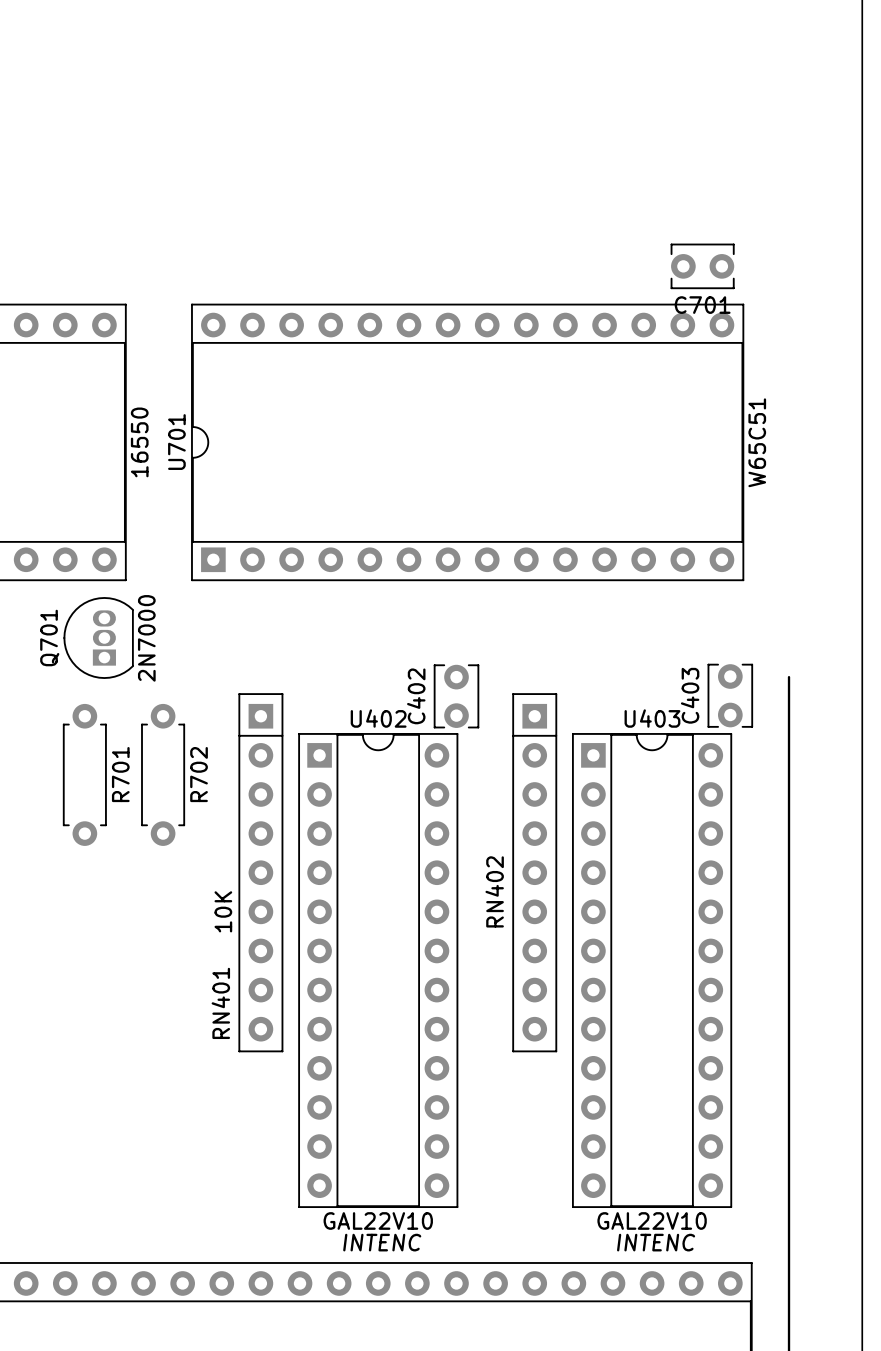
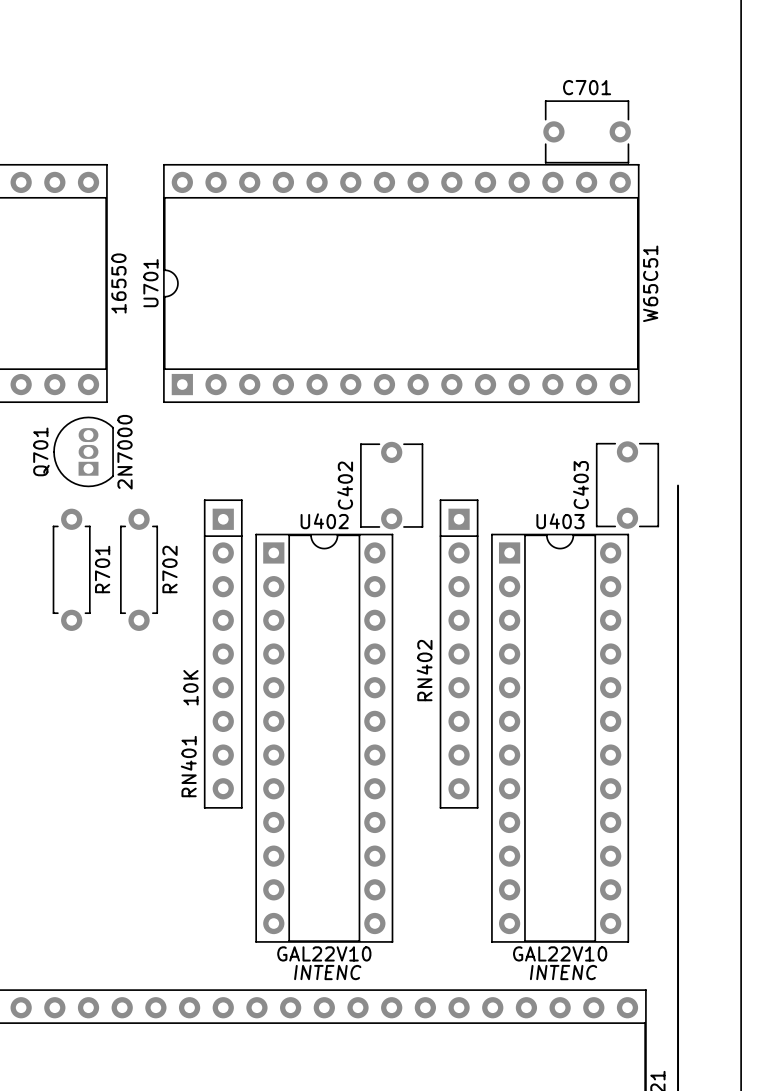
C701 footprint: [670, 243, 735, 290] -> [543, 100, 631, 164]
C701 name position: C701 (702, 305) -> C701 (587, 87)
C403 footprint: [707, 663, 754, 728] -> [595, 441, 660, 529]
C402 footprint: [433, 664, 480, 729] -> [360, 441, 424, 530]

